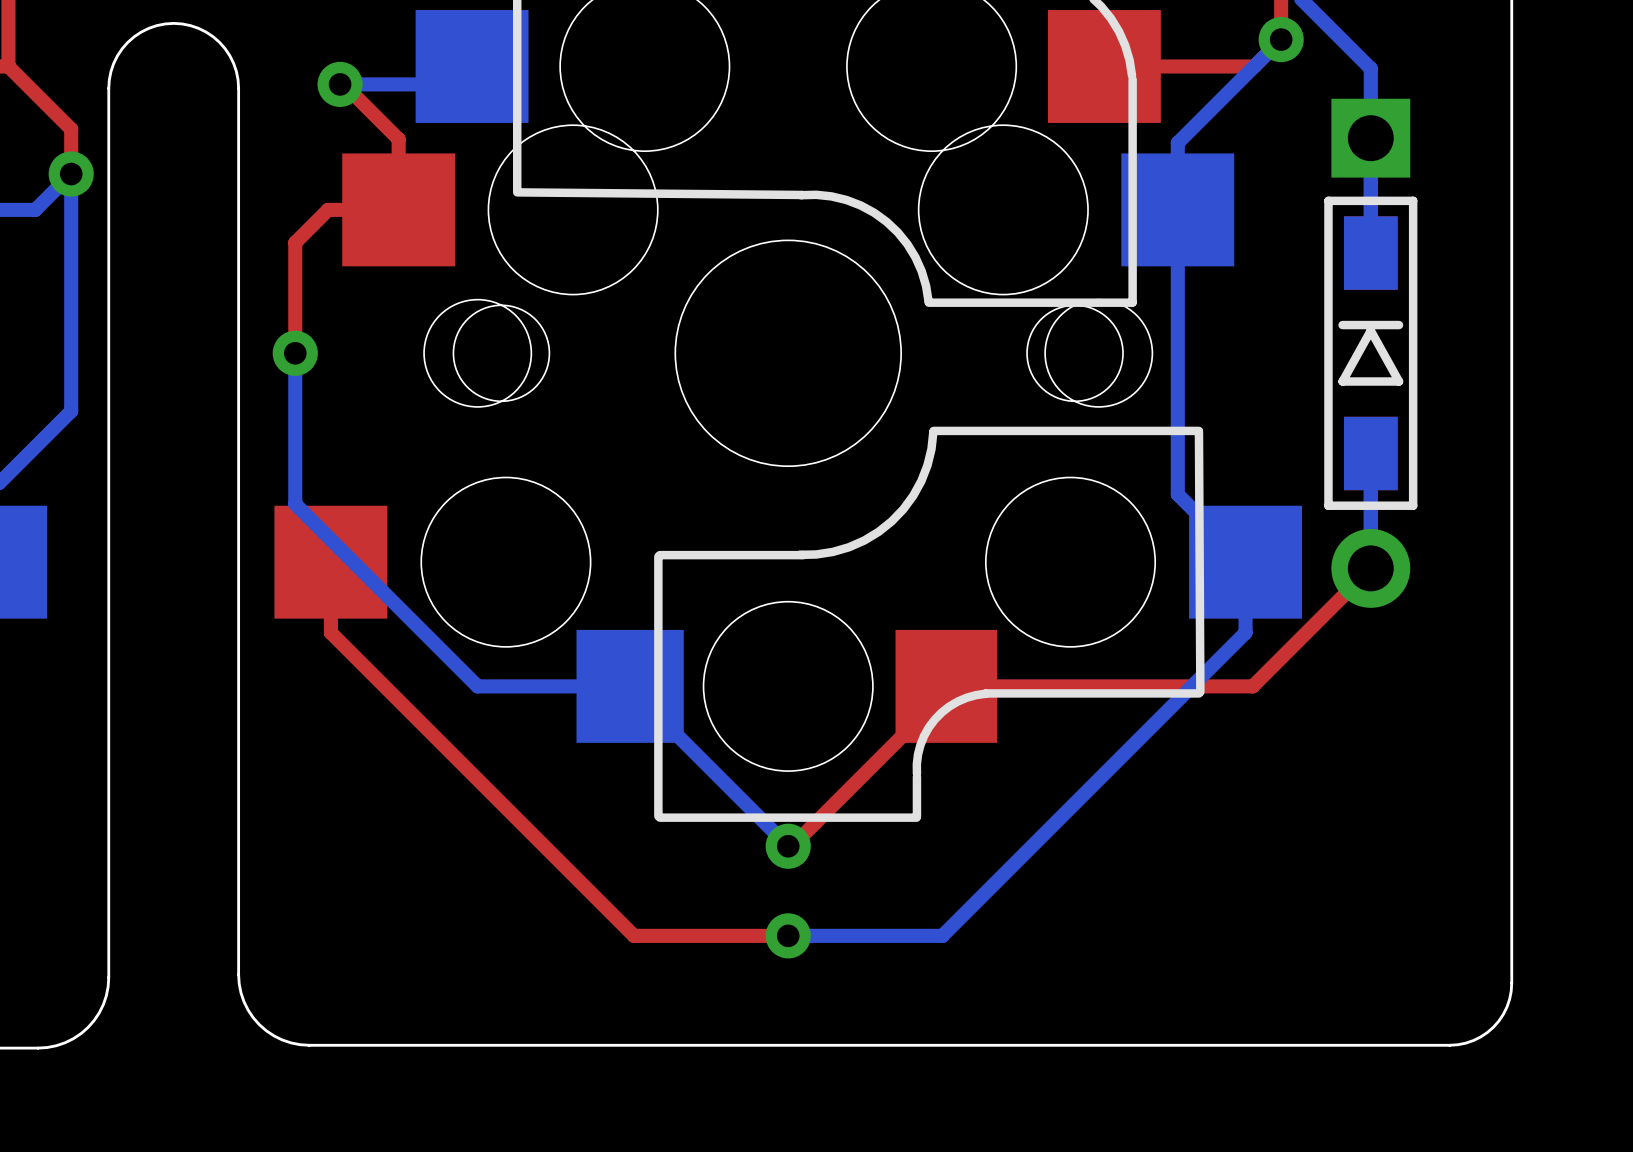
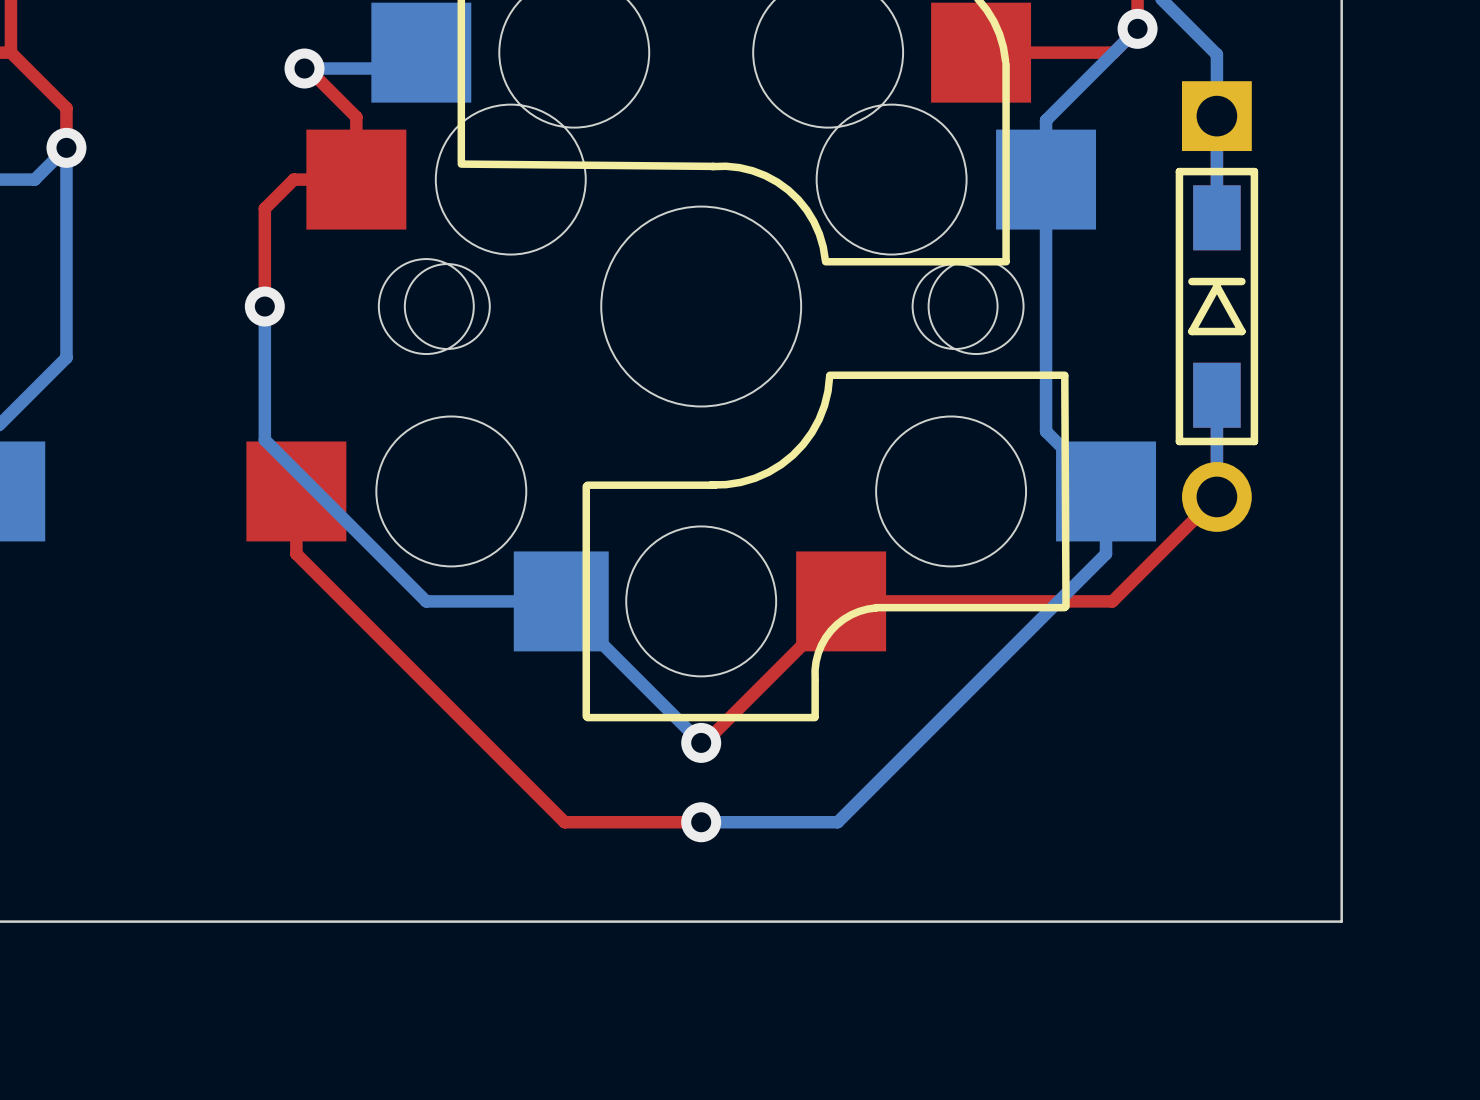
board edge: (1511, 983) (1507, 1006) (1493, 1027) (1473, 1040) (1449, 1045) (309, 1045) (282, 1039) (266, 1030) (253, 1017) (243, 1001) (238, 974) (238, 79) (229, 55) (213, 36) (198, 28) (173, 23) (148, 28) (134, 36) (117, 55) (109, 79) (108, 986) (99, 1012) (81, 1033) (65, 1042) (38, 1048) -> (1341, 864) (1341, 921) (37, 921)

